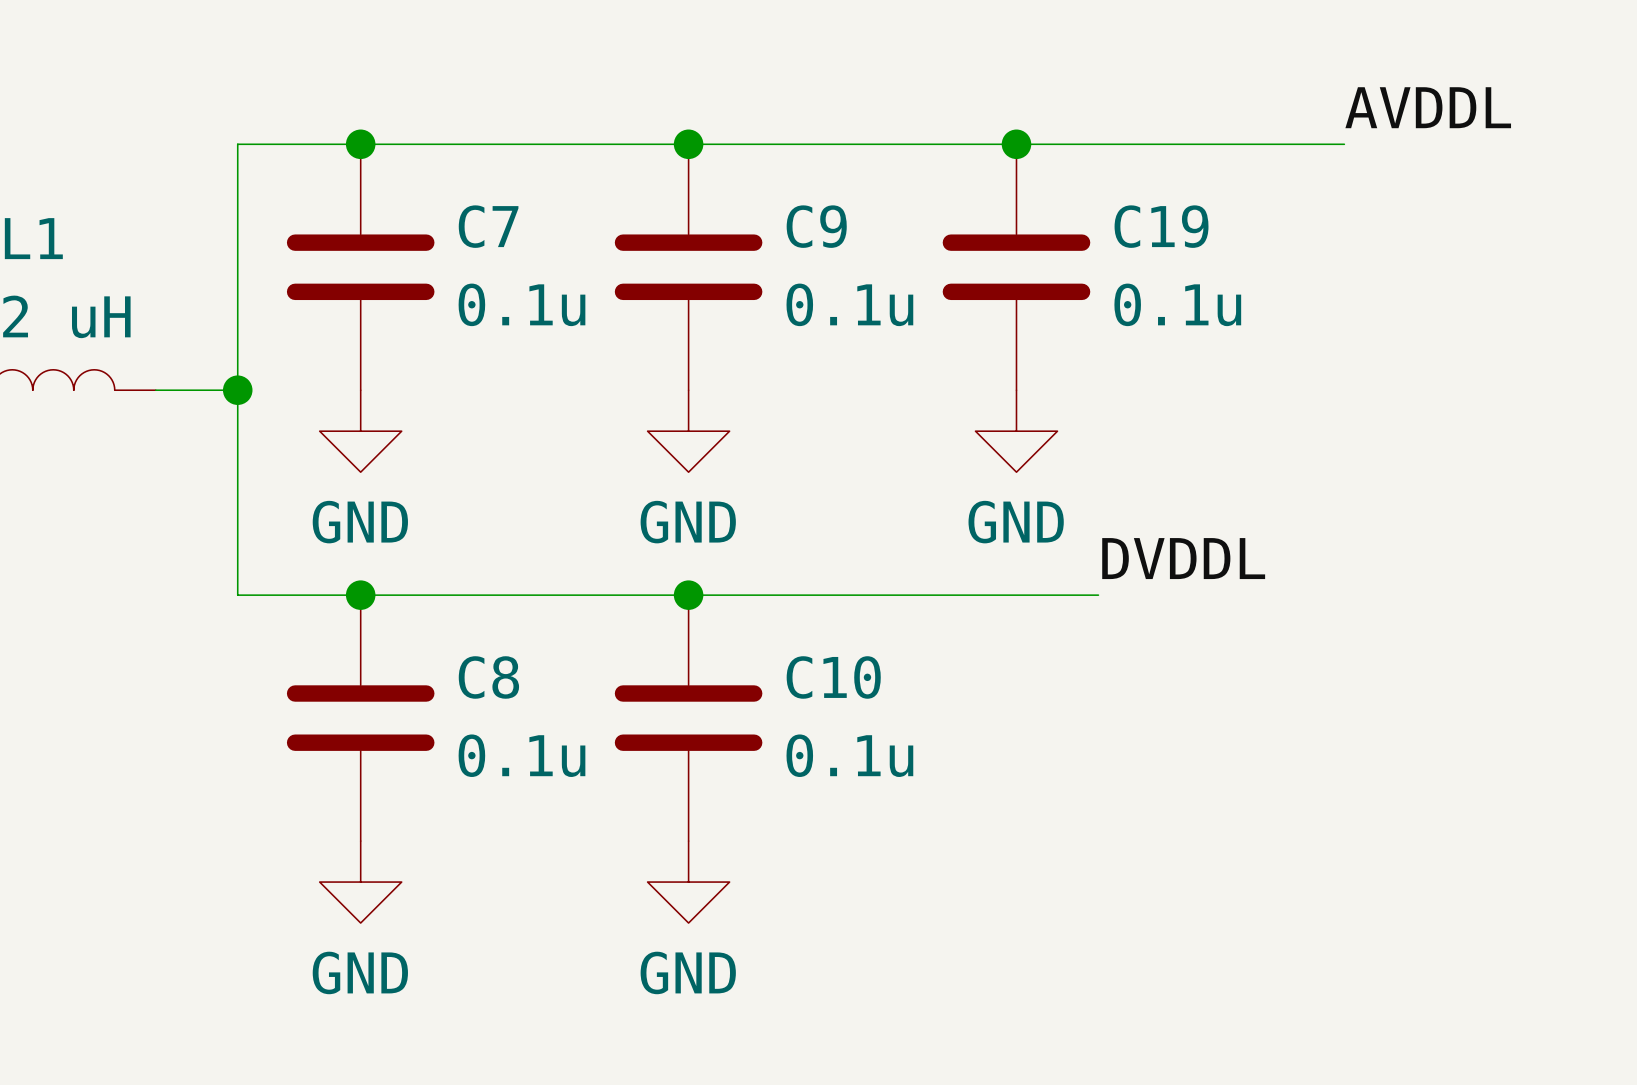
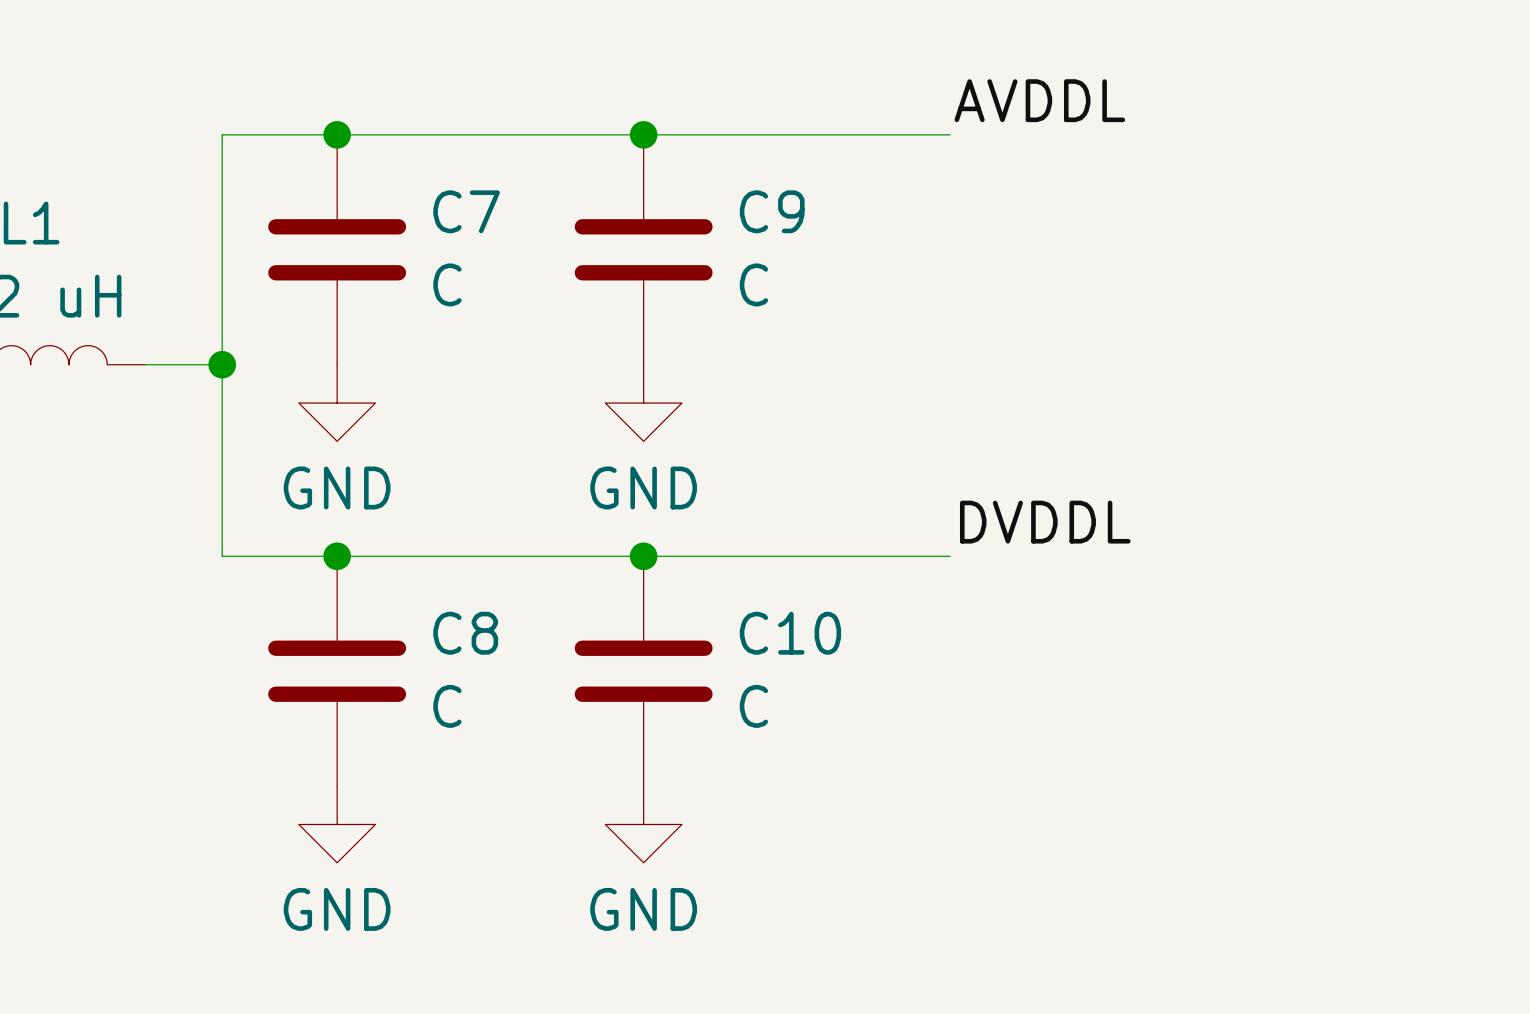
label position: AVDDL (1428, 107) -> AVDDL (1039, 100)
wire: (1016, 144) (1344, 144) -> none
junction: (1016, 144) -> none
C19: 0.1u (1016, 267) -> none
C7 value: 0.1u (521, 304) -> C (447, 284)
C9 value: 0.1u (849, 304) -> C (753, 284)
power symbol: GND (1016, 431) -> none
label position: DVDDL (1183, 558) -> DVDDL (1045, 522)
wire: (1016, 595) (1098, 595) -> none
C8 value: 0.1u (521, 755) -> C (447, 706)
C10 value: 0.1u (849, 755) -> C (753, 706)

